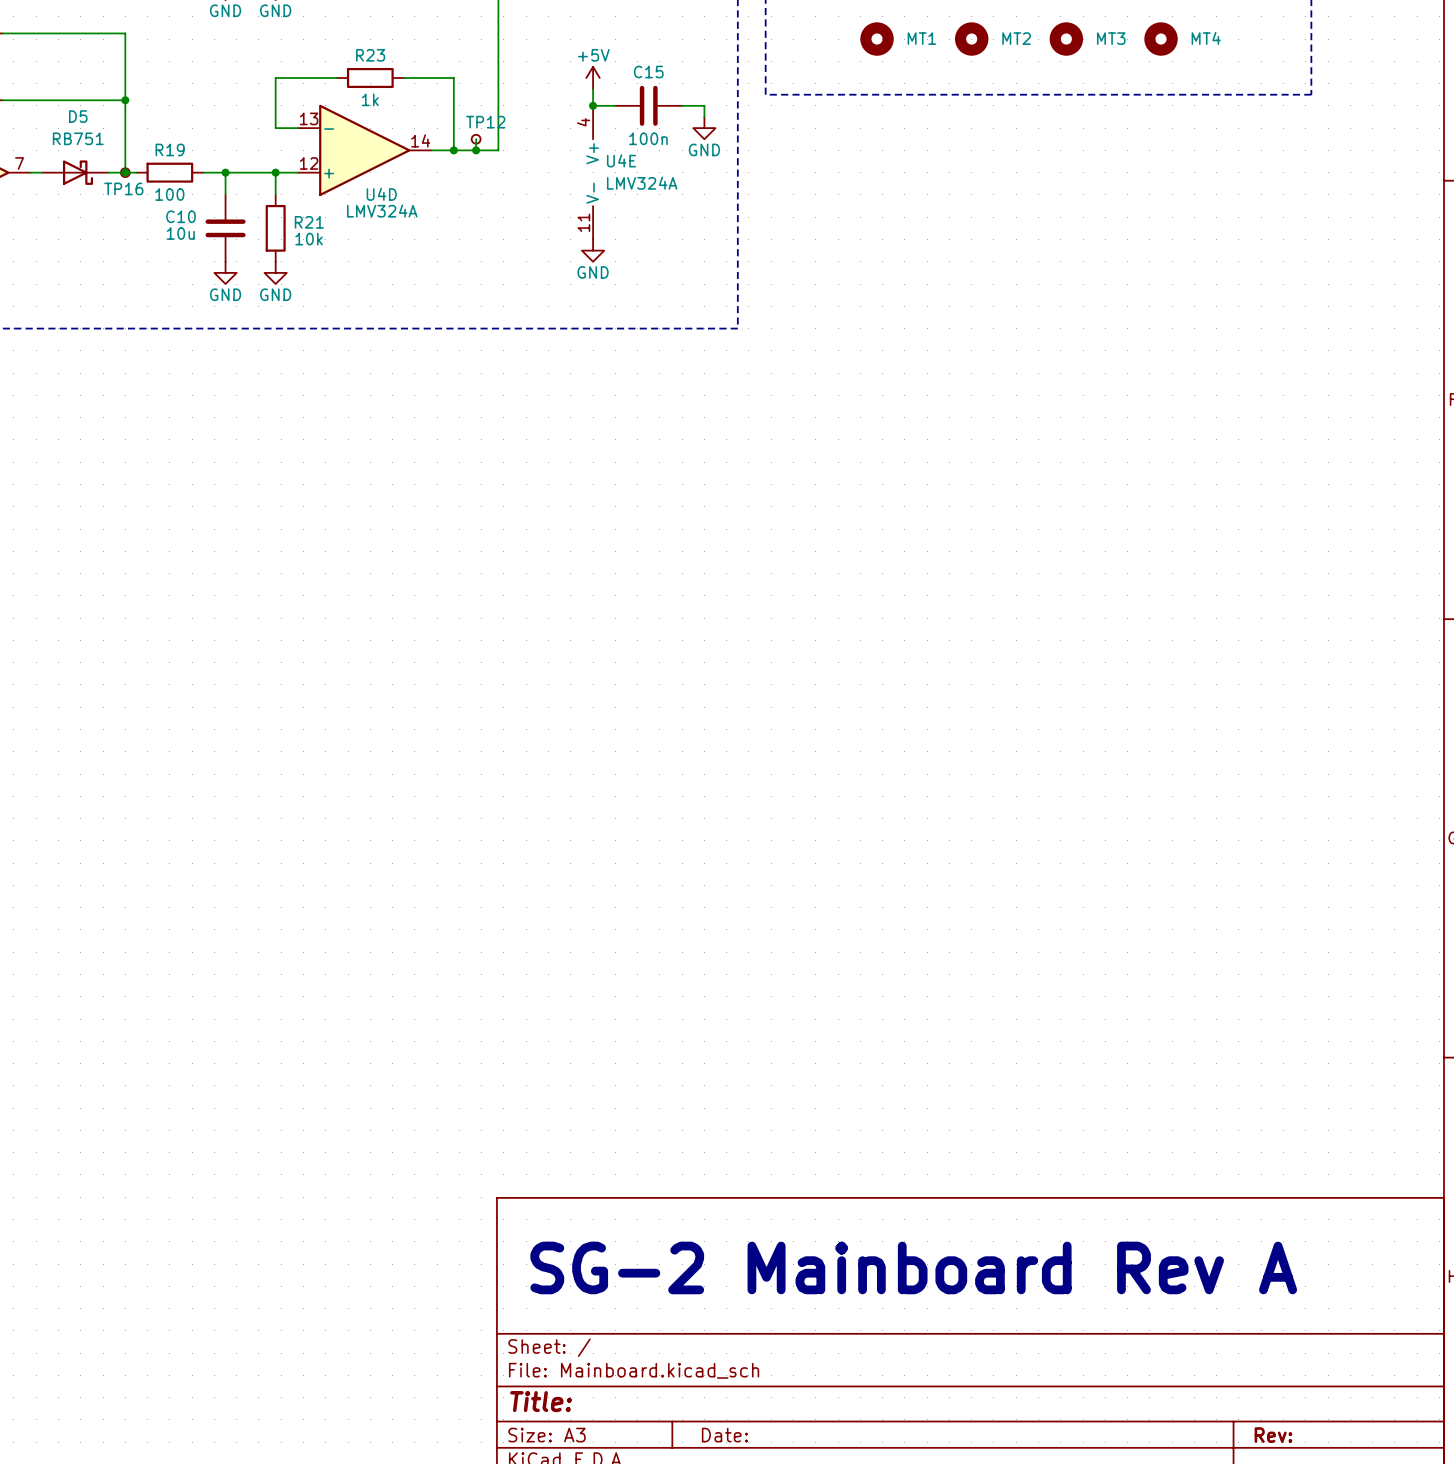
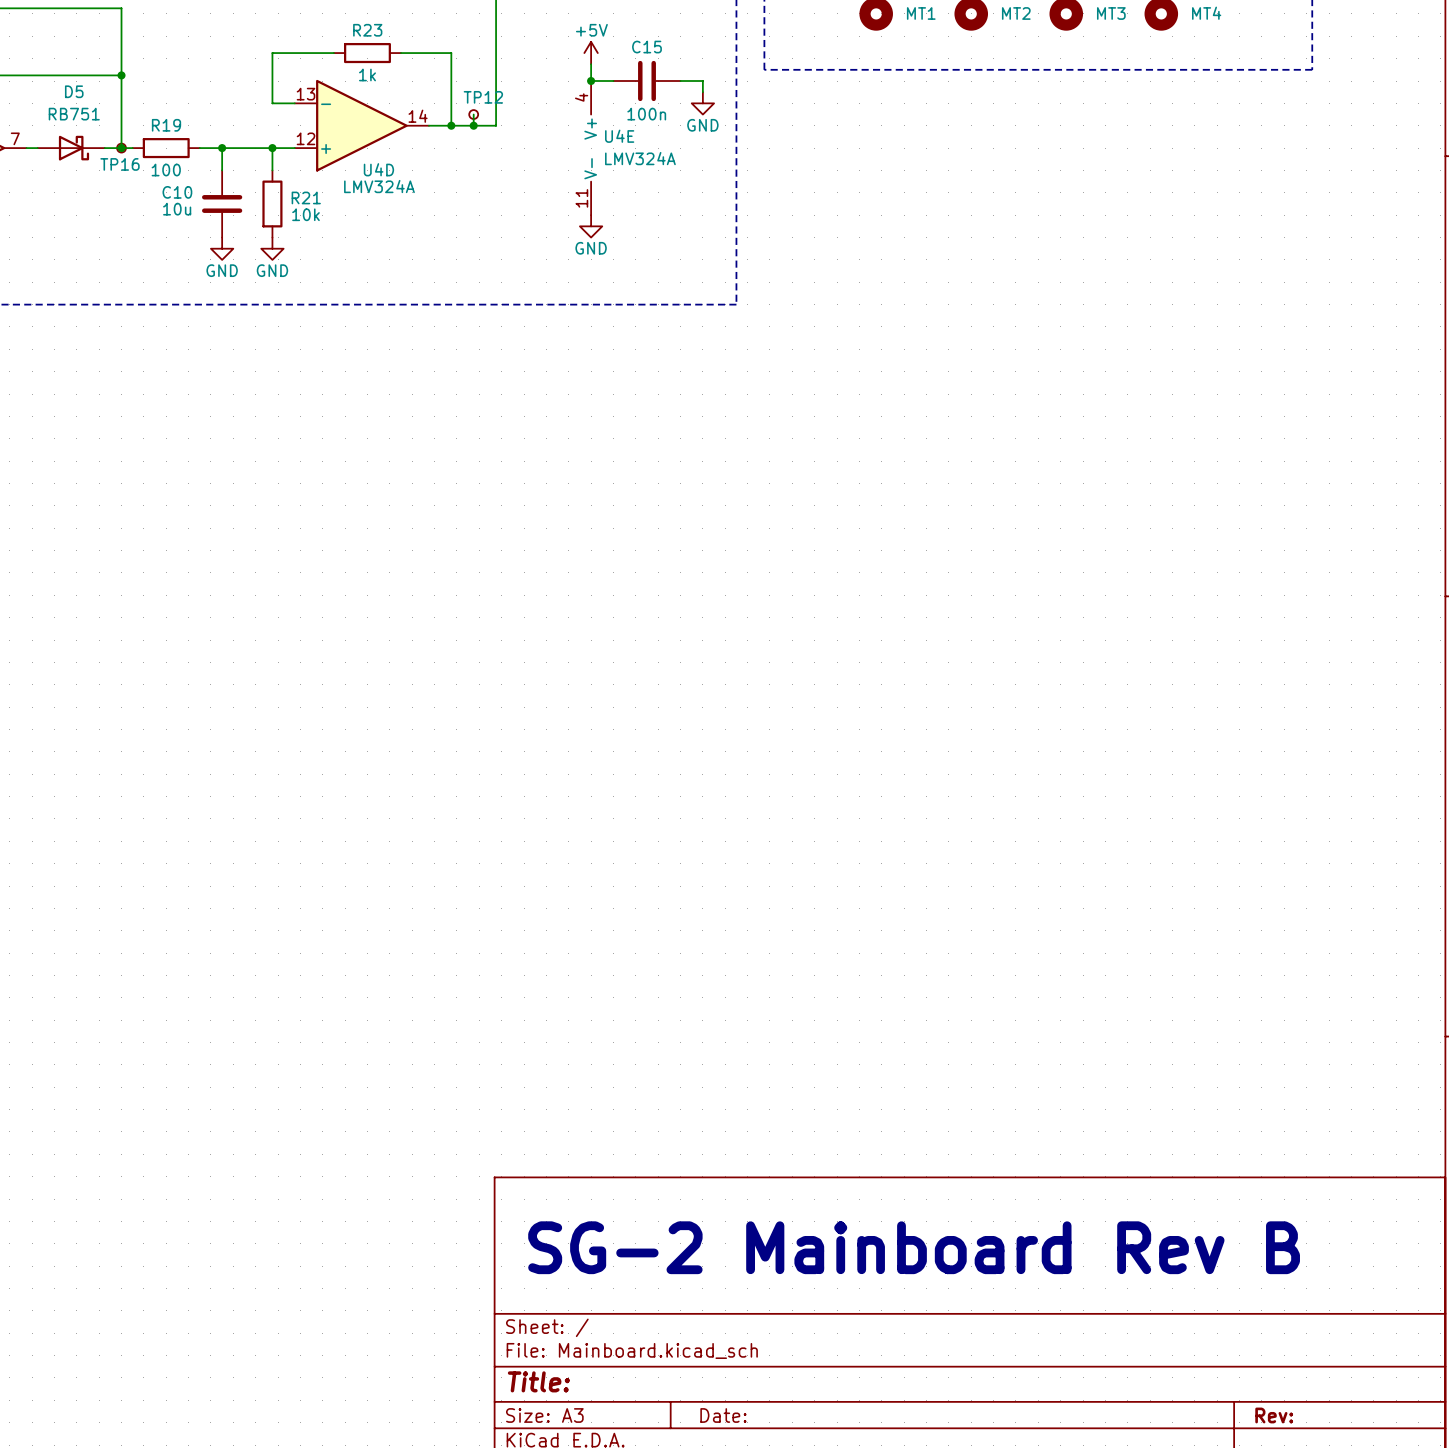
text: SG-2 Mainboard Rev A (913, 1267) -> SG-2 Mainboard Rev B (914, 1247)

